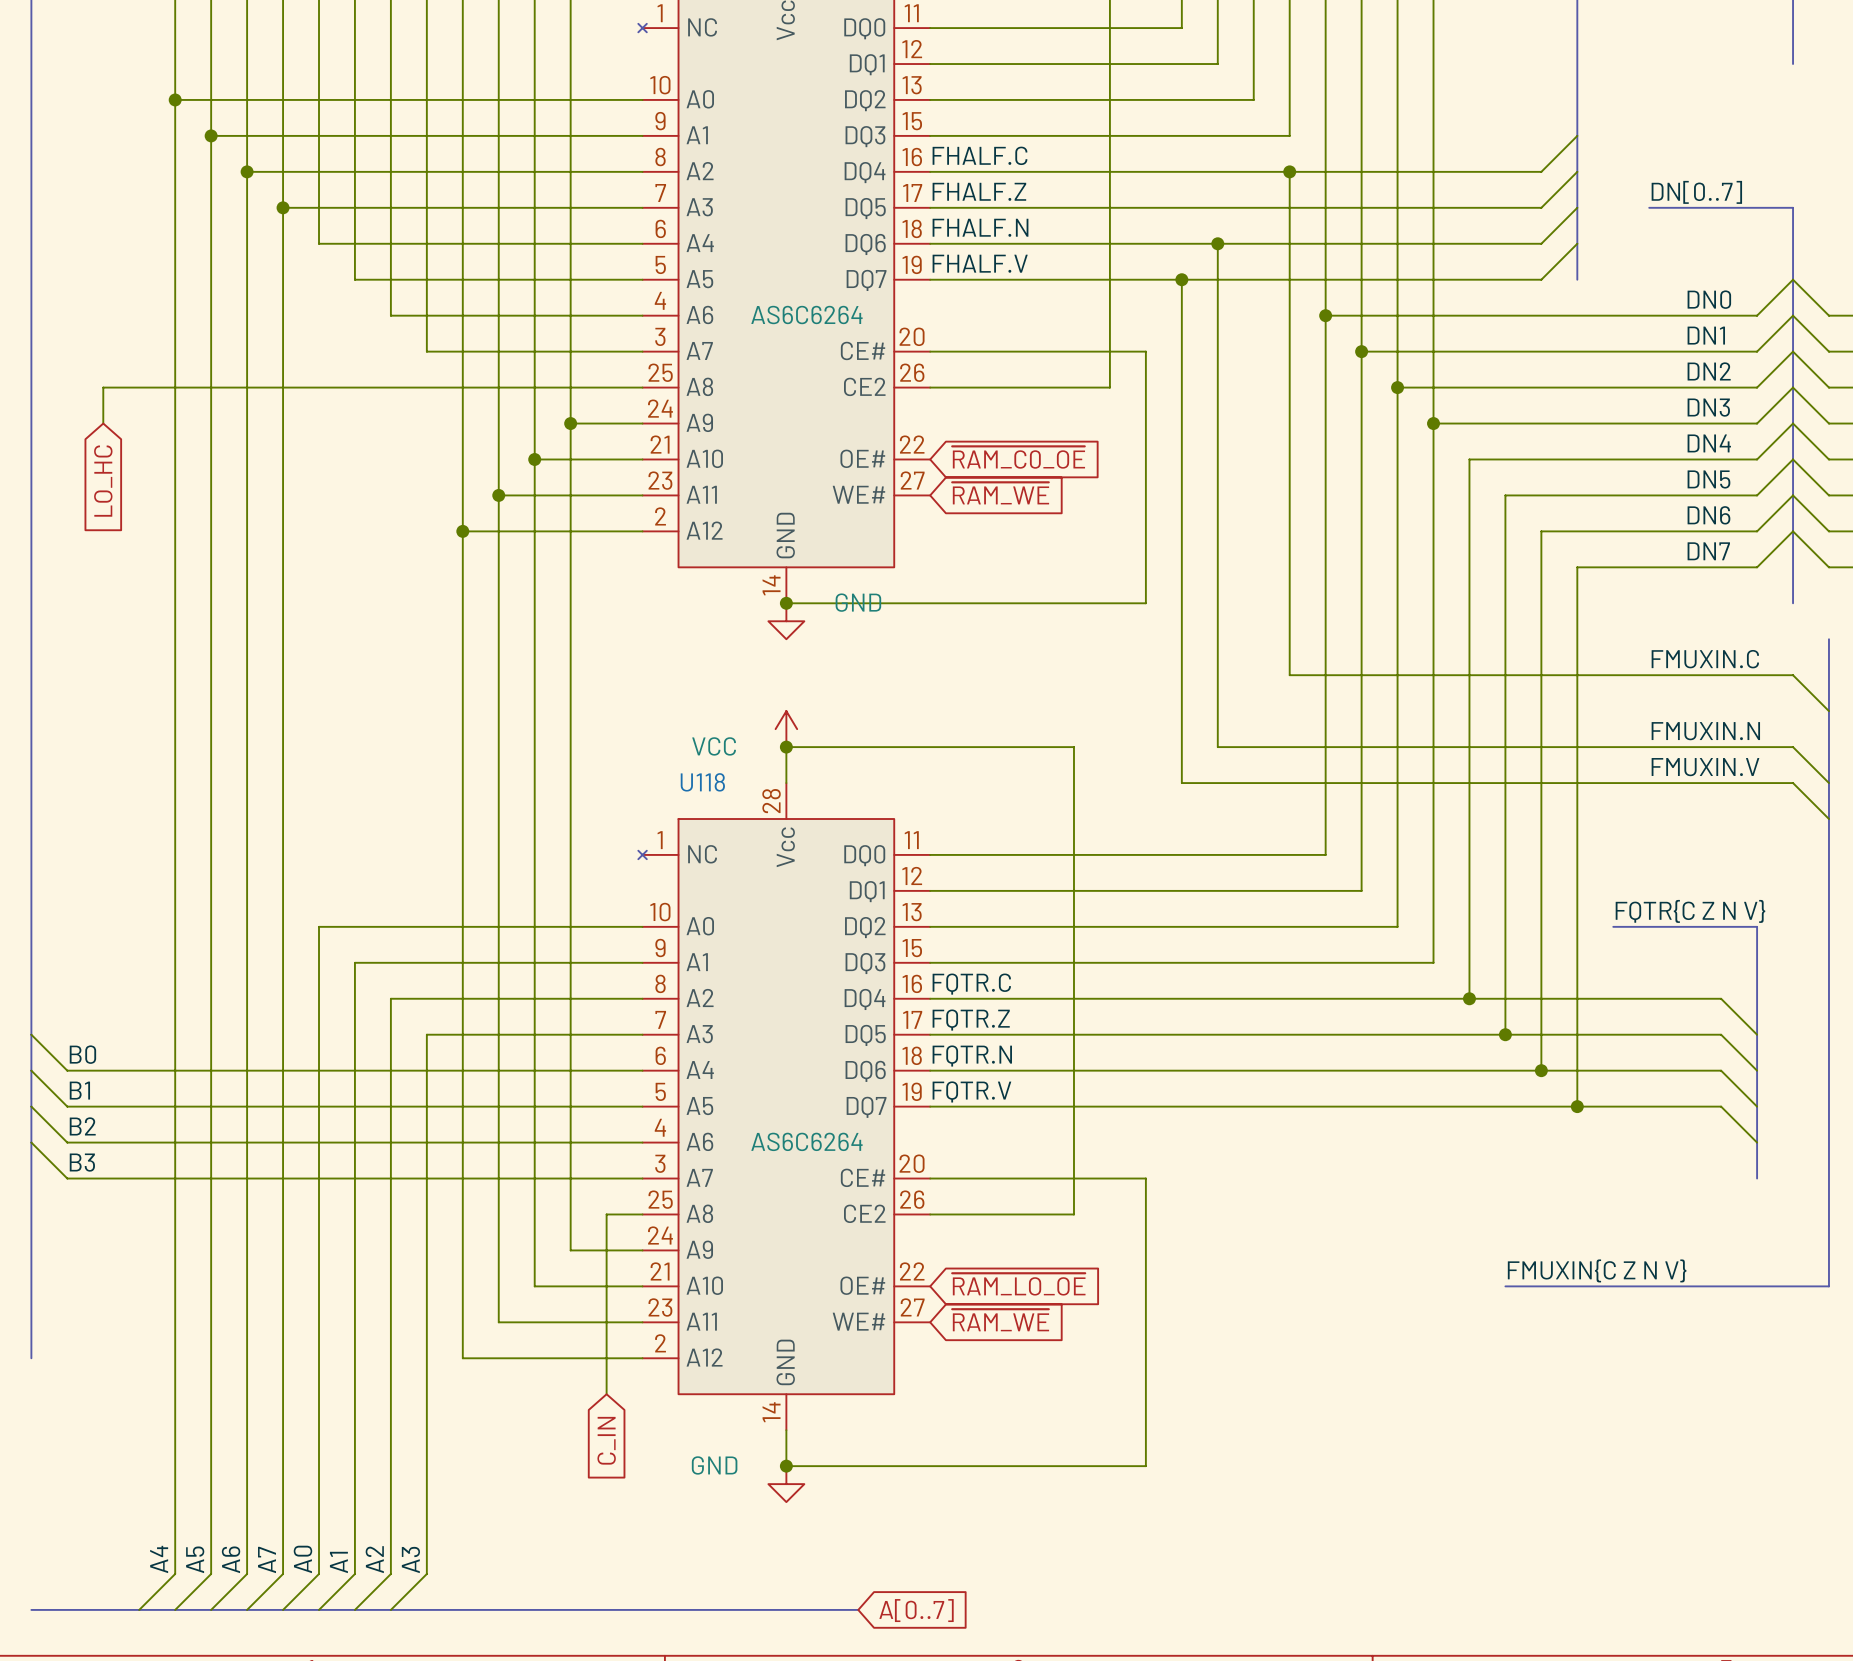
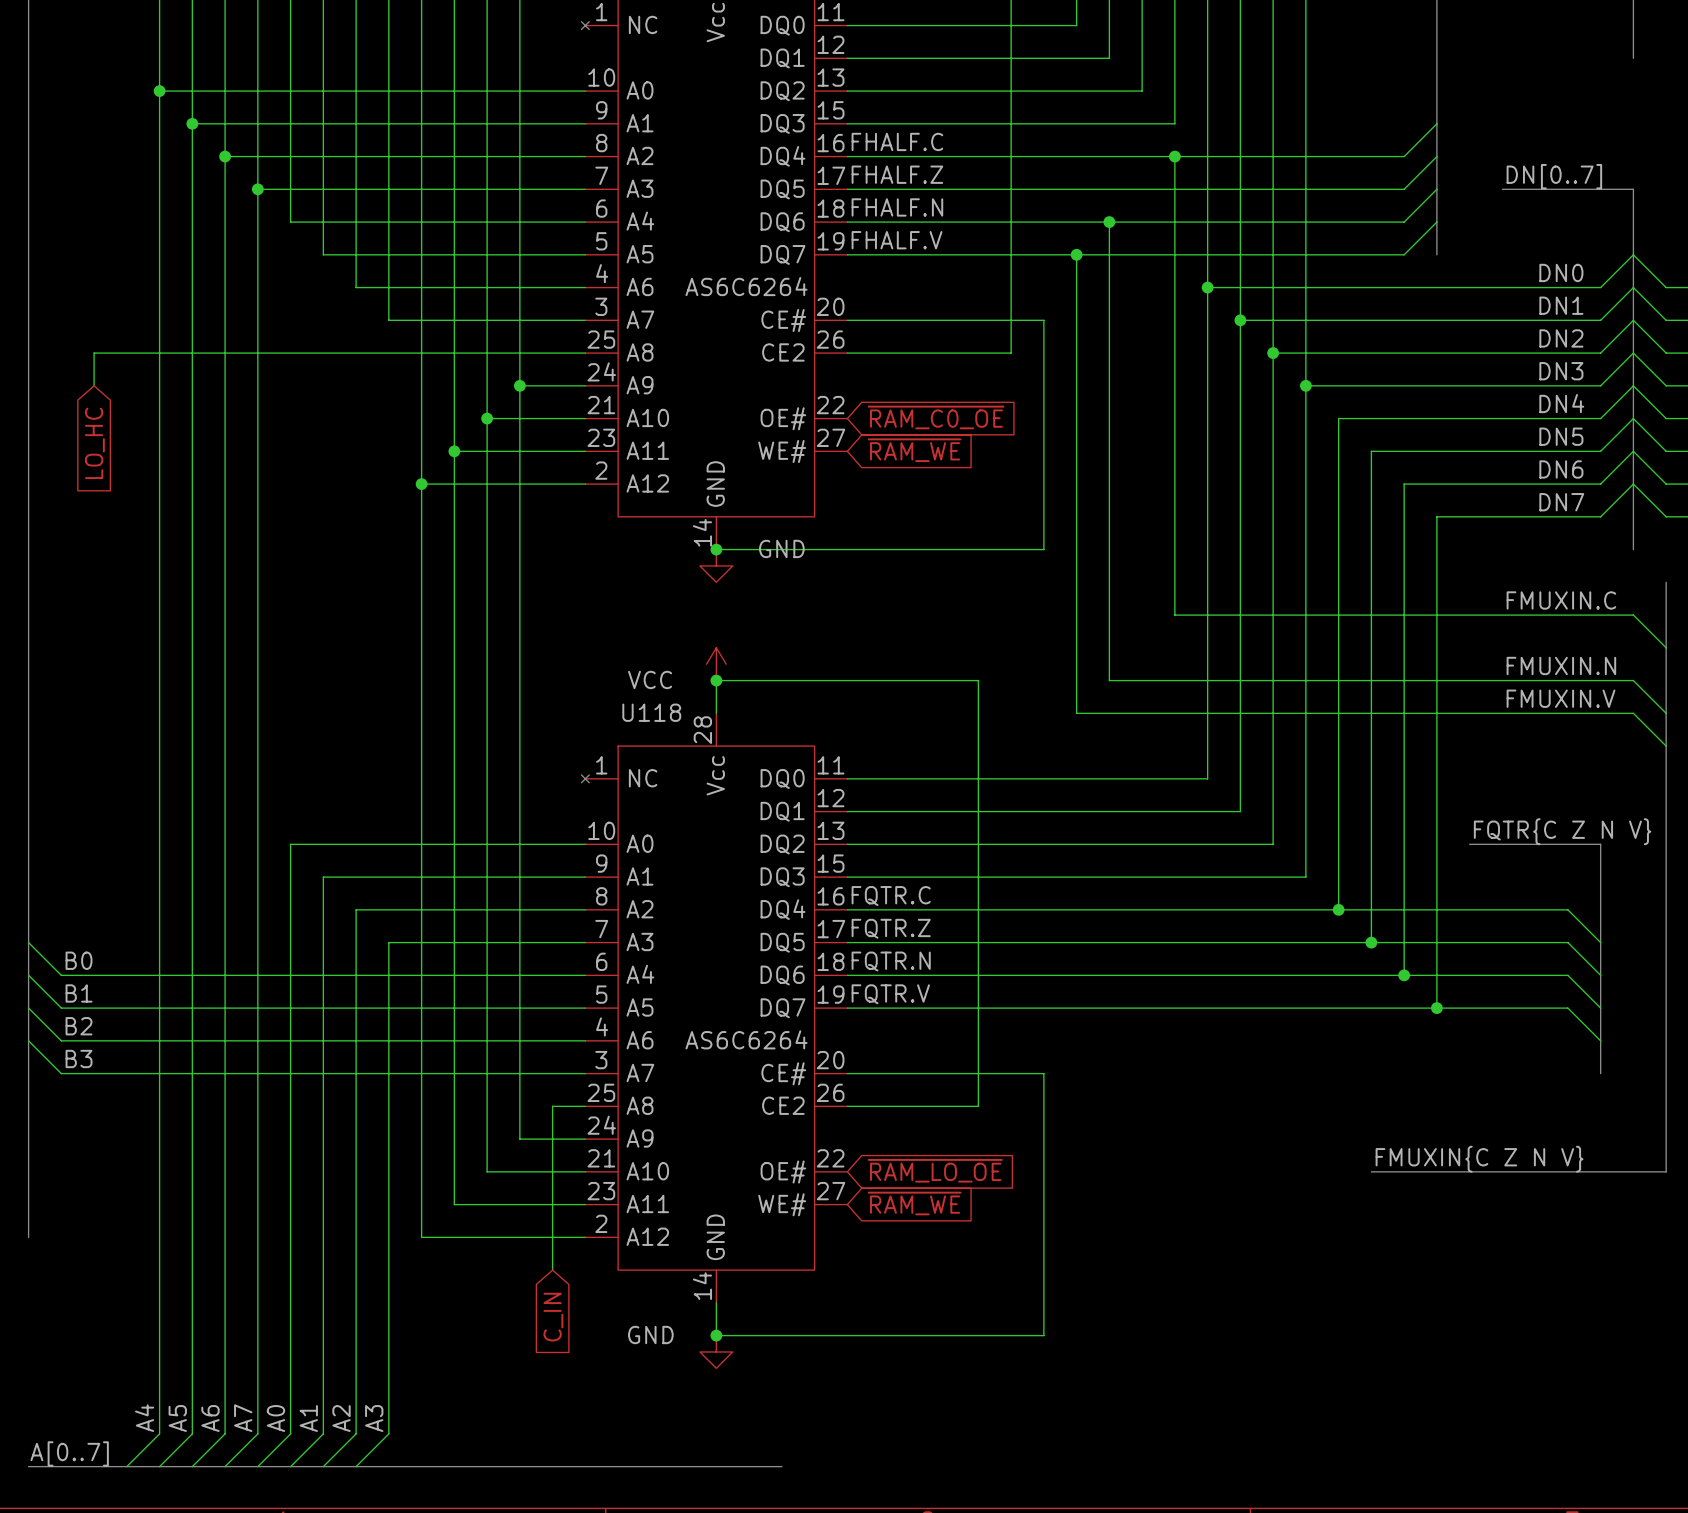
label: none -> A[0..7] (69, 1453)
global label: A[0..7] (916, 1610) -> none

